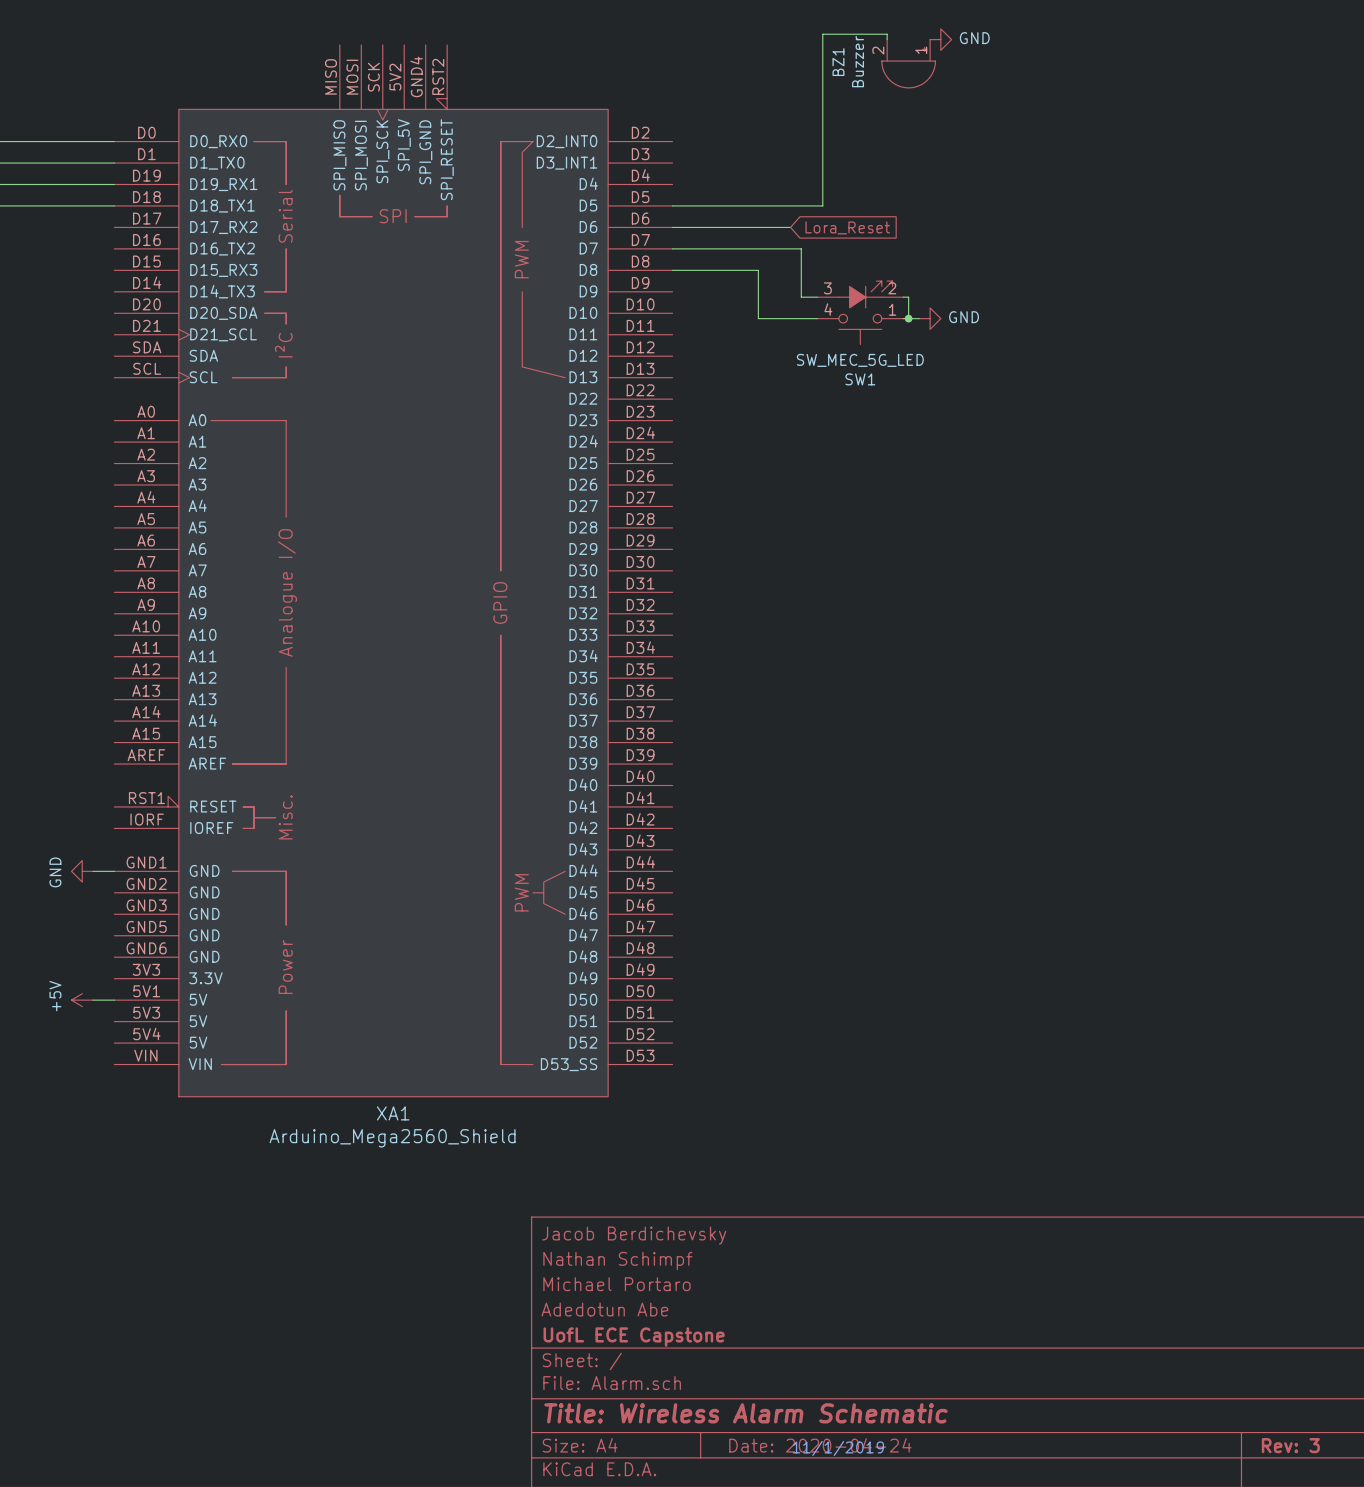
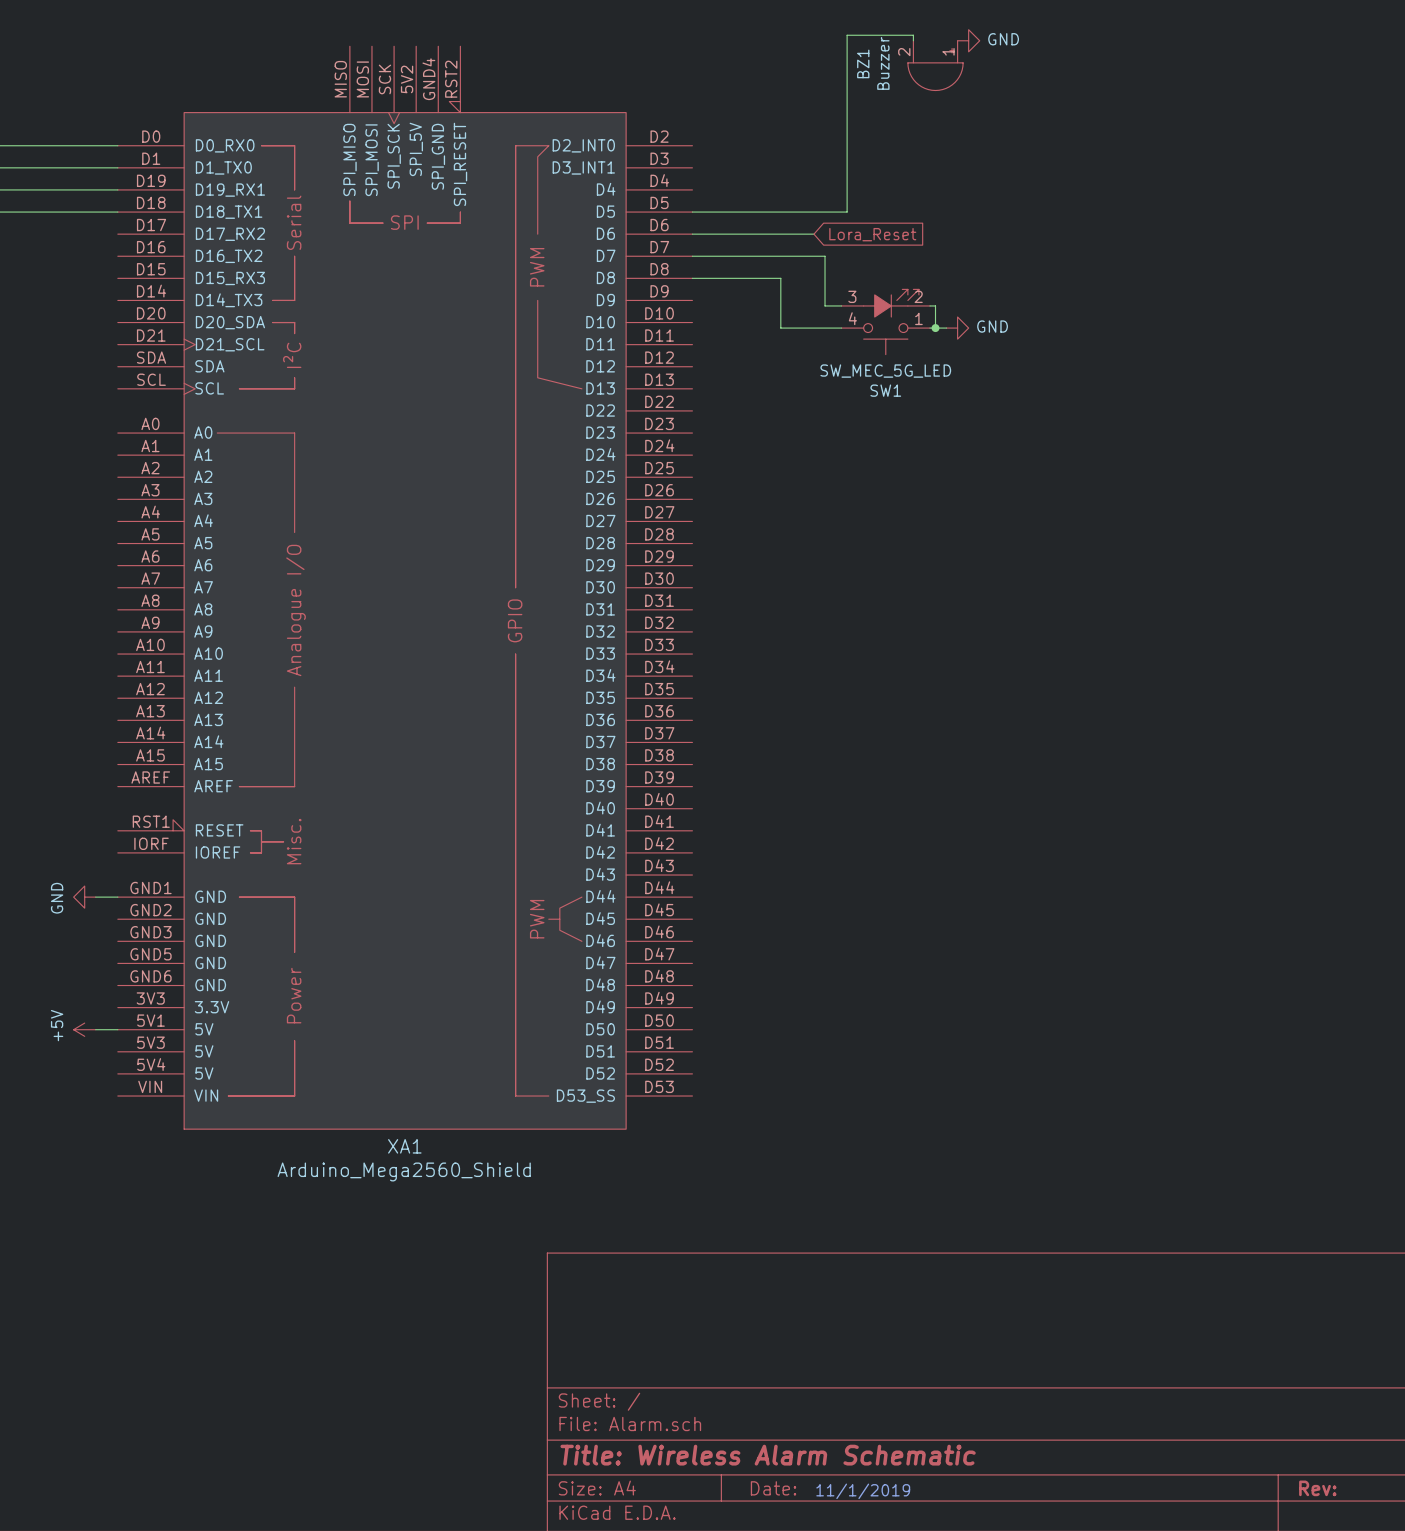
title block: Jacob Berdichevsky (634, 1235) -> none
title block: Nathan Schimpf (617, 1260) -> none
title block: Michael Portaro (616, 1284) -> none
title block: Adedotun Abe (604, 1309) -> none
title block: UofL ECE Capstone (634, 1337) -> none
title block: Date: 2020-04-24 (820, 1445) -> Date: (773, 1488)
title block: Rev: 3 (1290, 1445) -> Rev: (1317, 1488)

